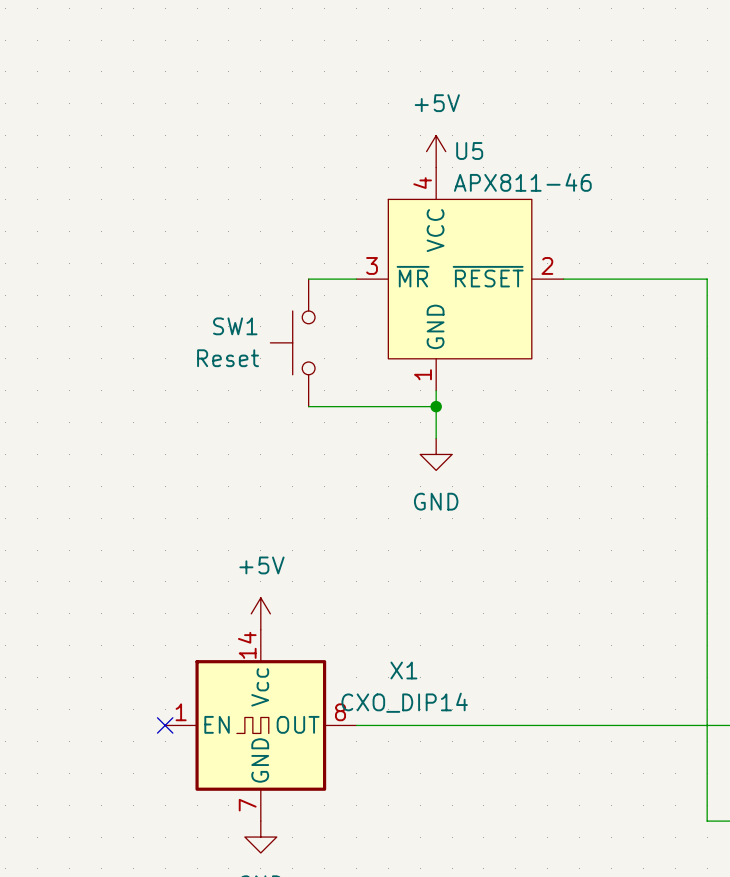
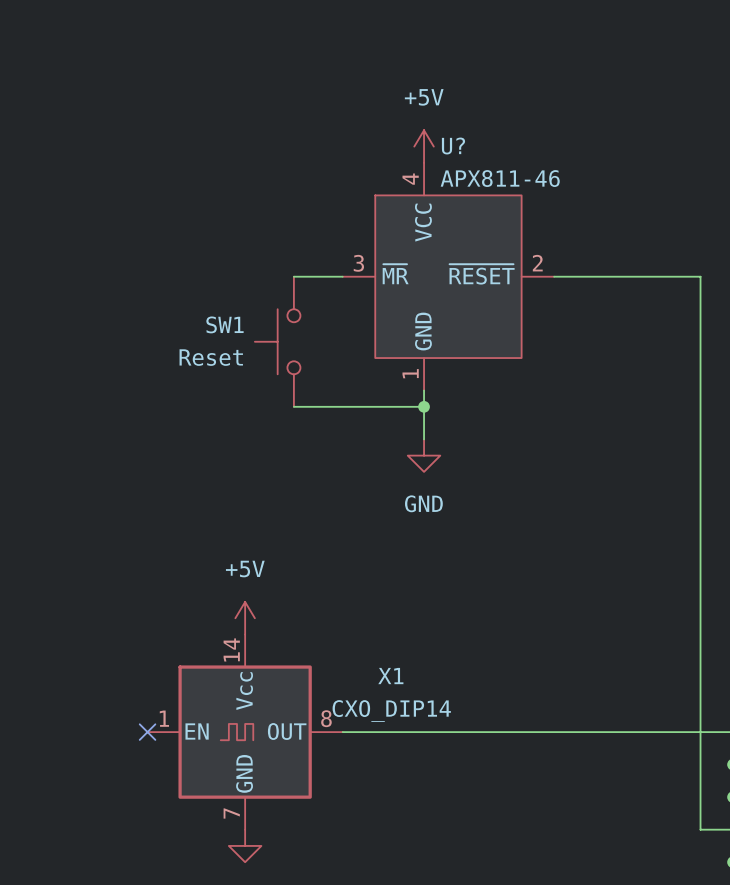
U5 name: U5 (469, 150) -> U? (453, 146)

